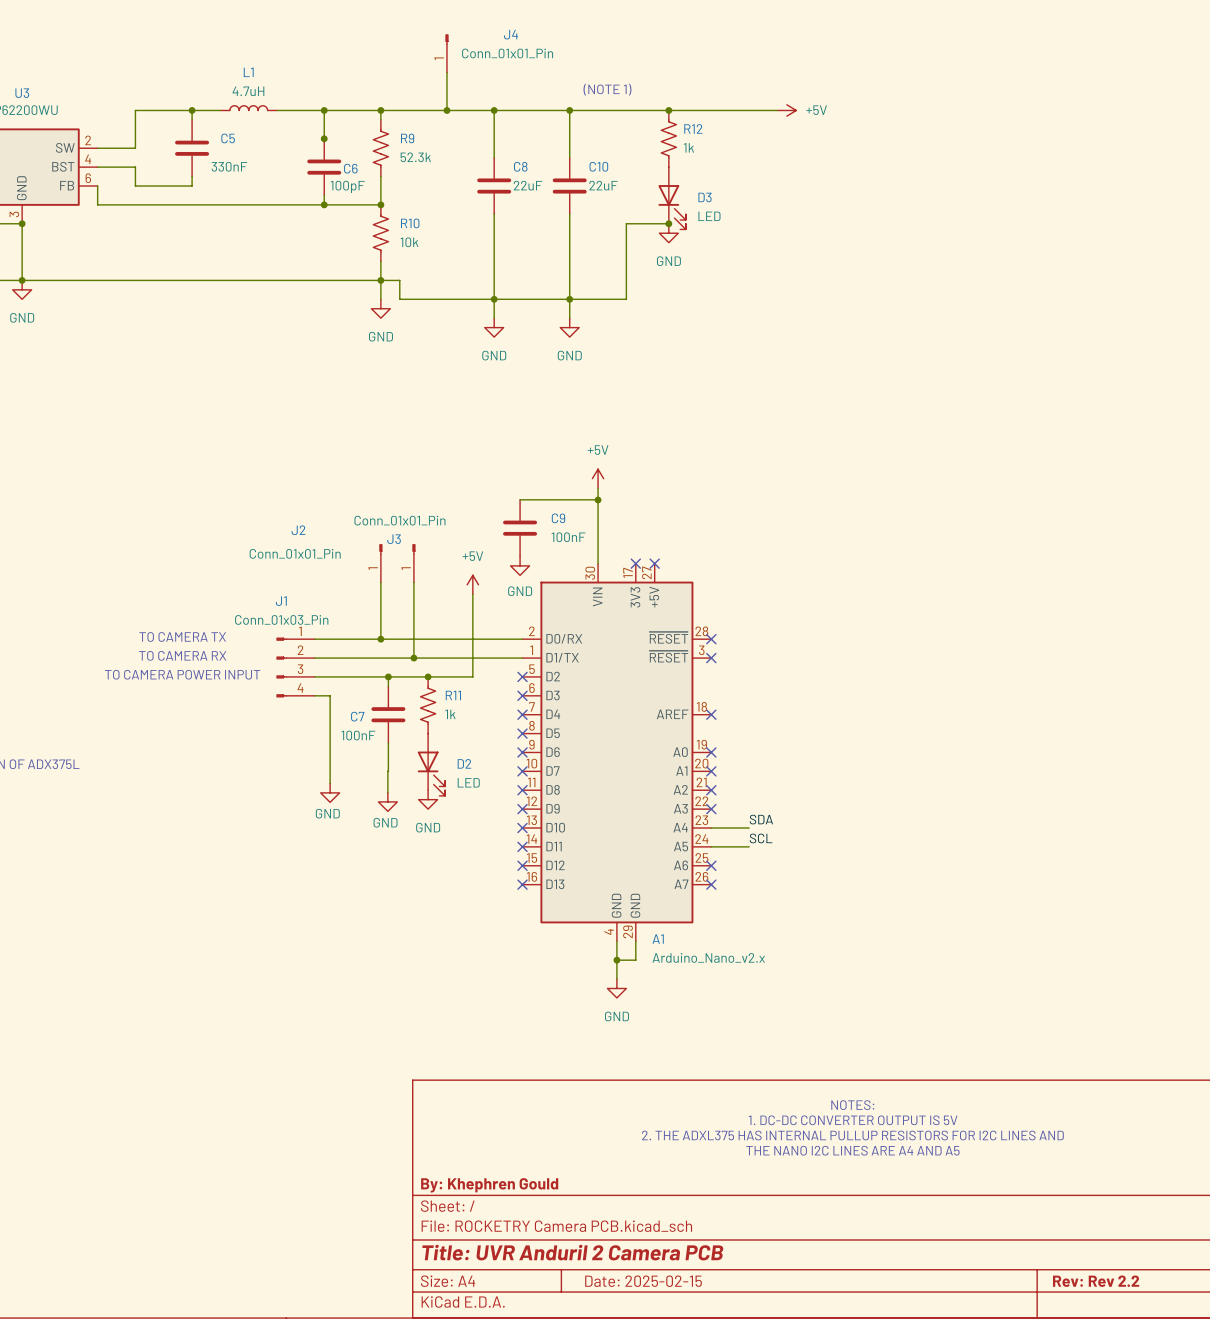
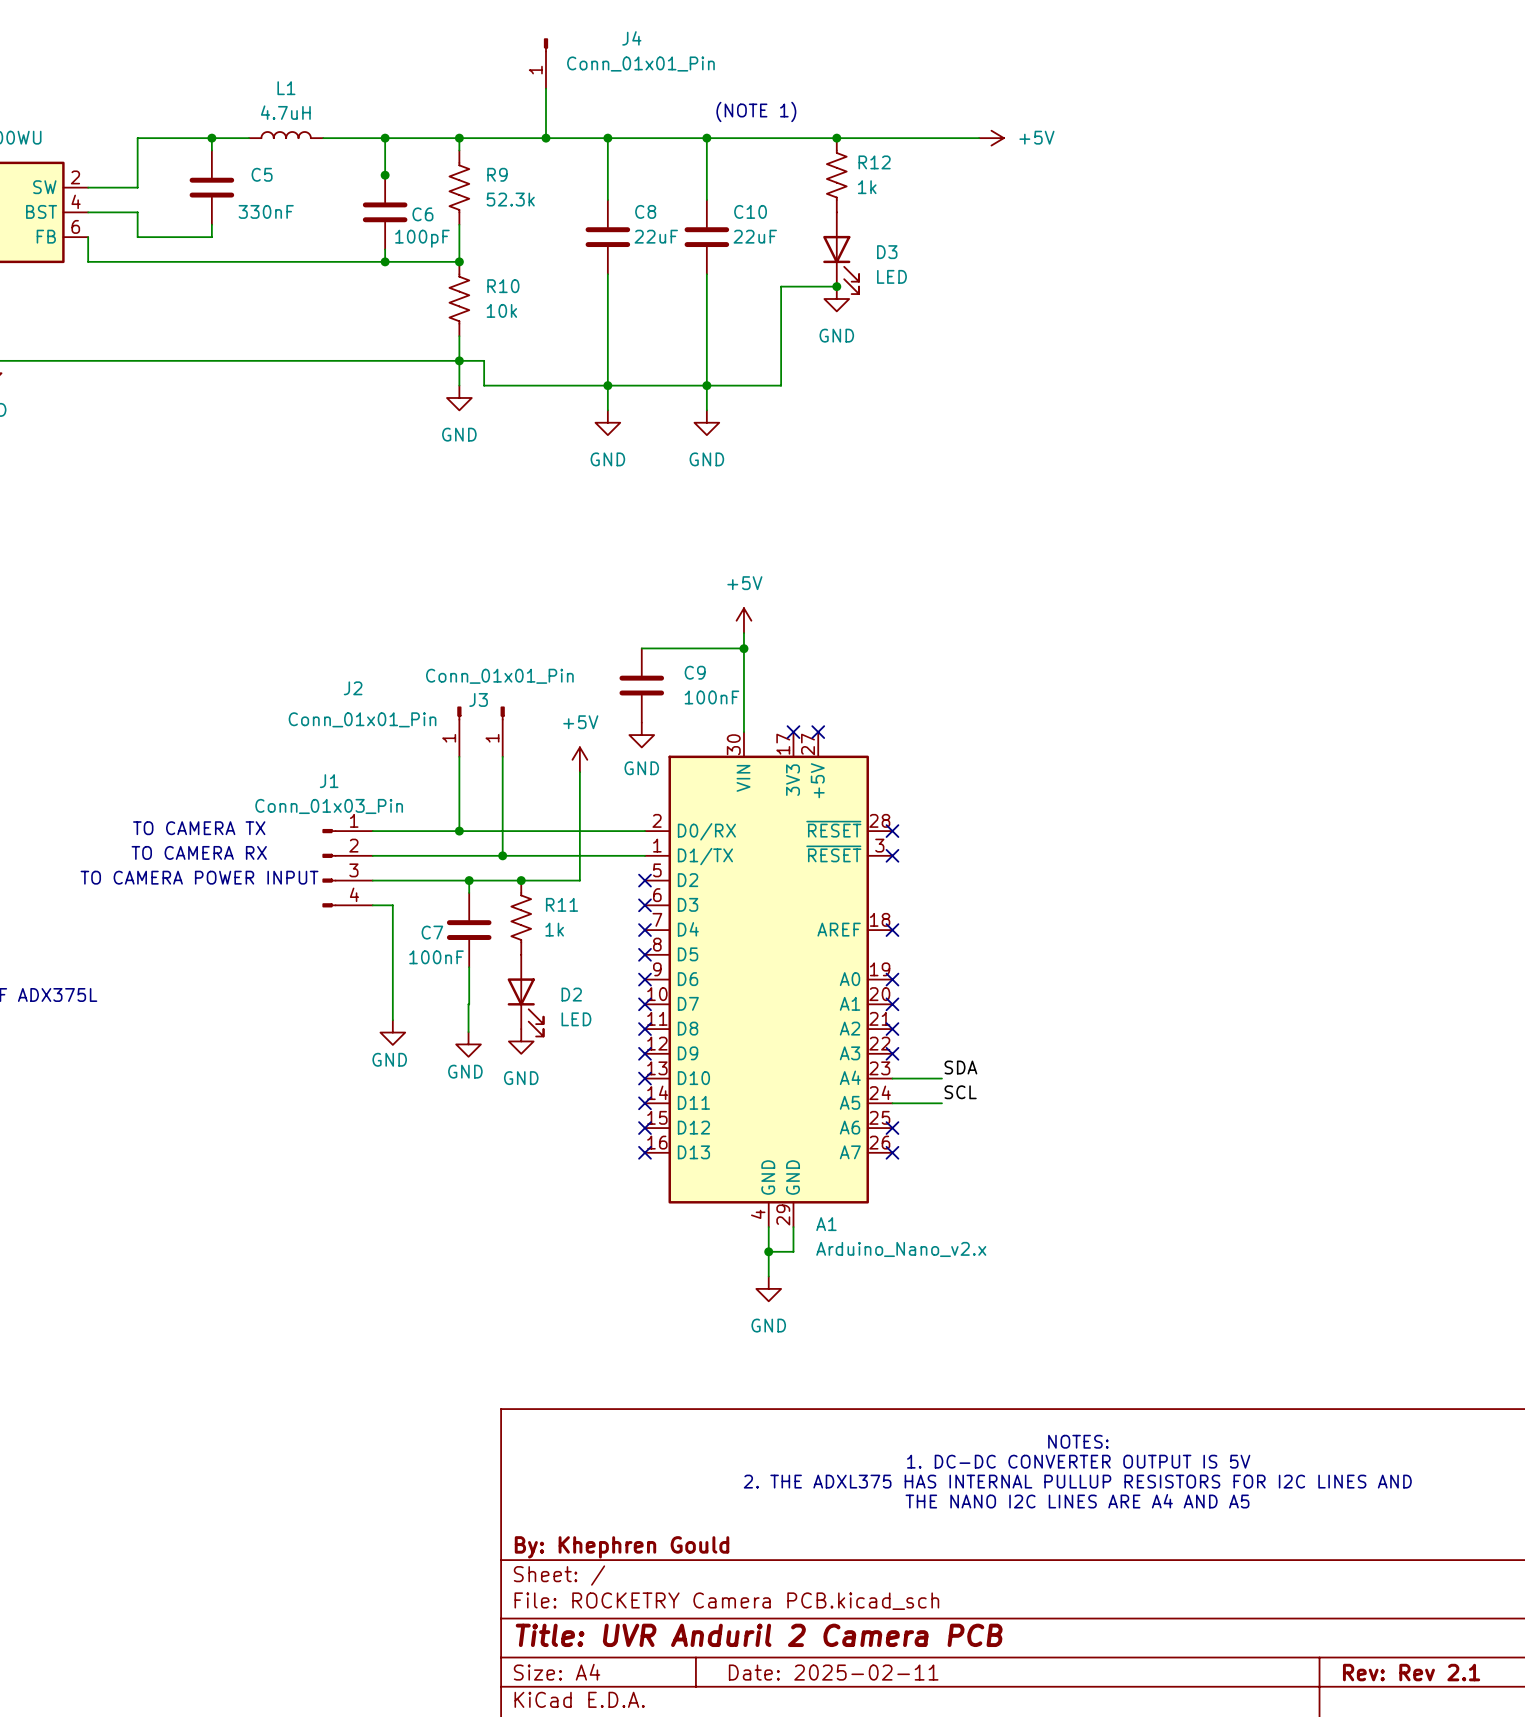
title block: Date: 2025-02-15 (643, 1281) -> Date: 2025-02-11 (833, 1672)
title block: Rev: Rev 2.2 (1096, 1281) -> Rev: Rev 2.1 (1411, 1672)

